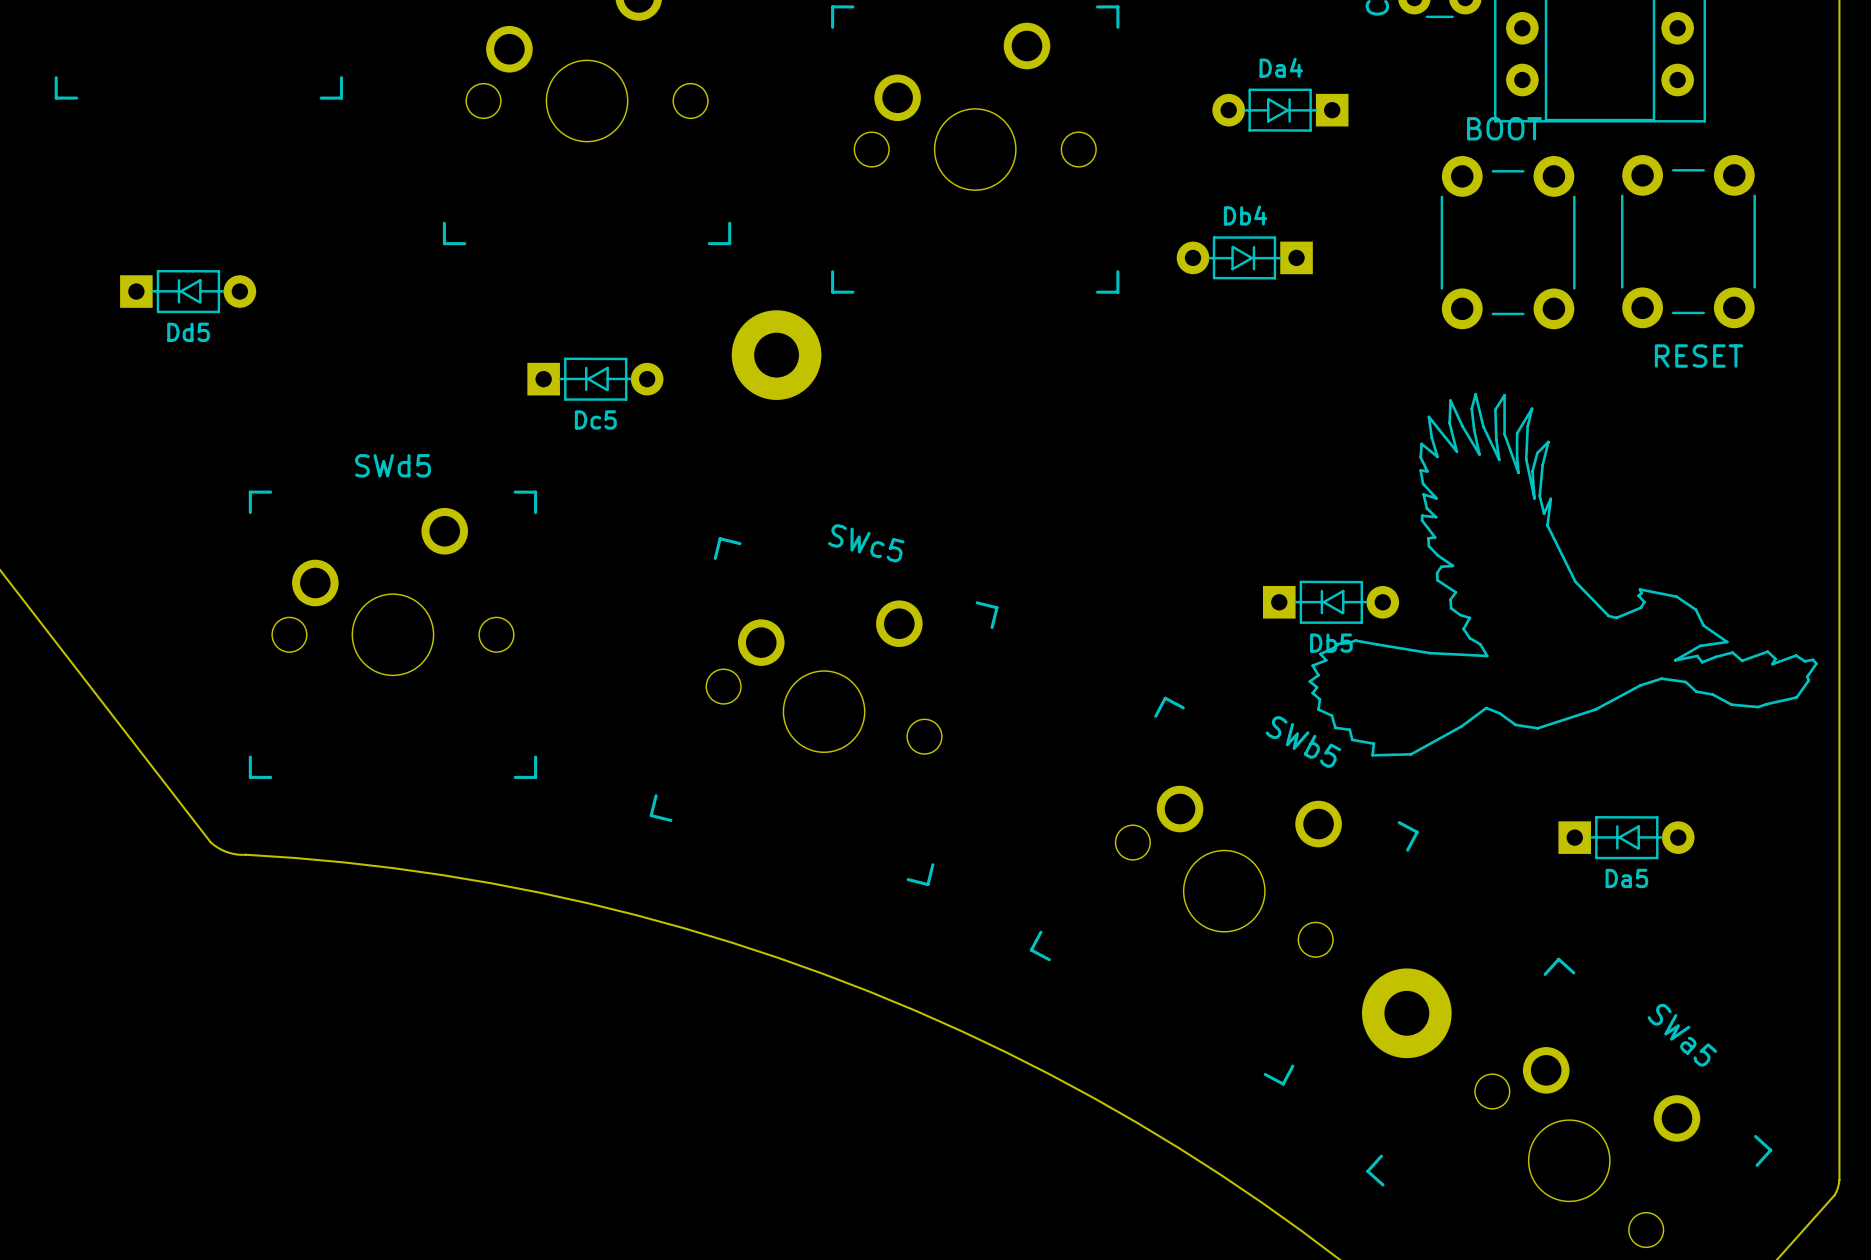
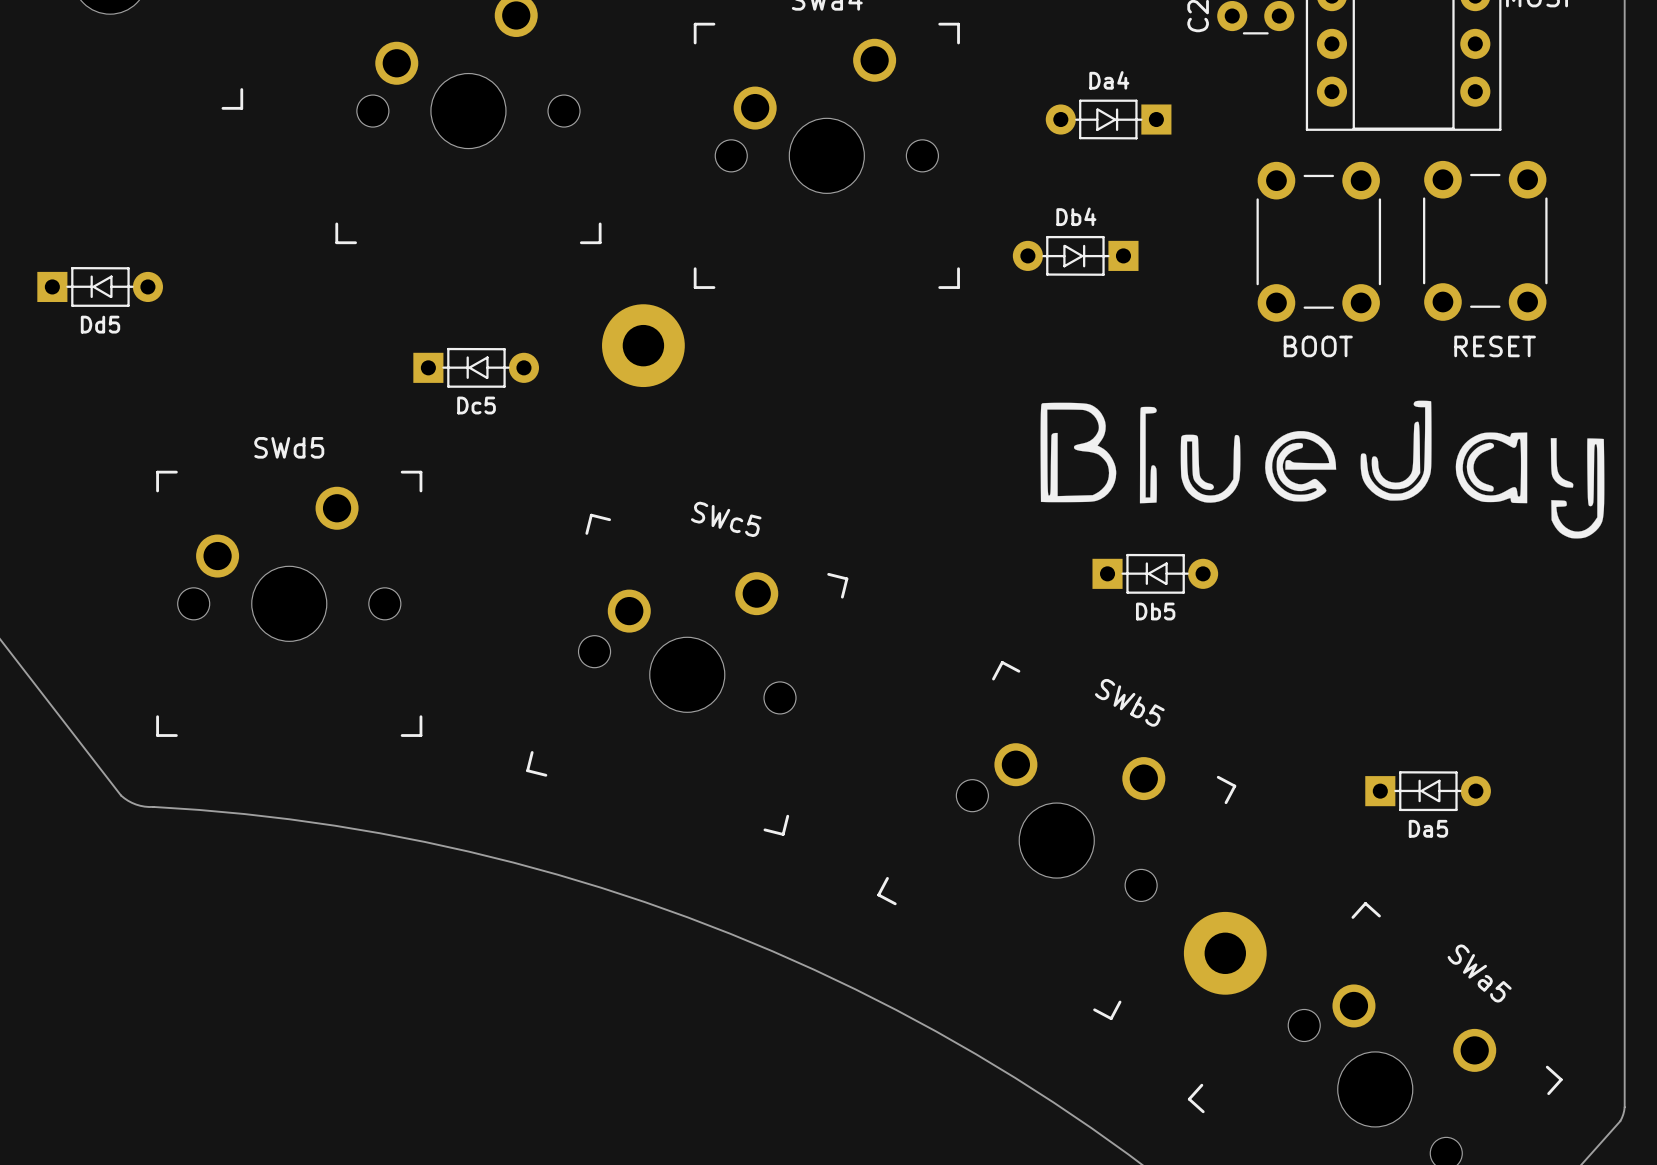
part value position: BOOT (1504, 128) -> BOOT (1318, 346)
drawing: [1308, 392, 1818, 757] -> none
drawing: none -> [1040, 400, 1605, 539]

